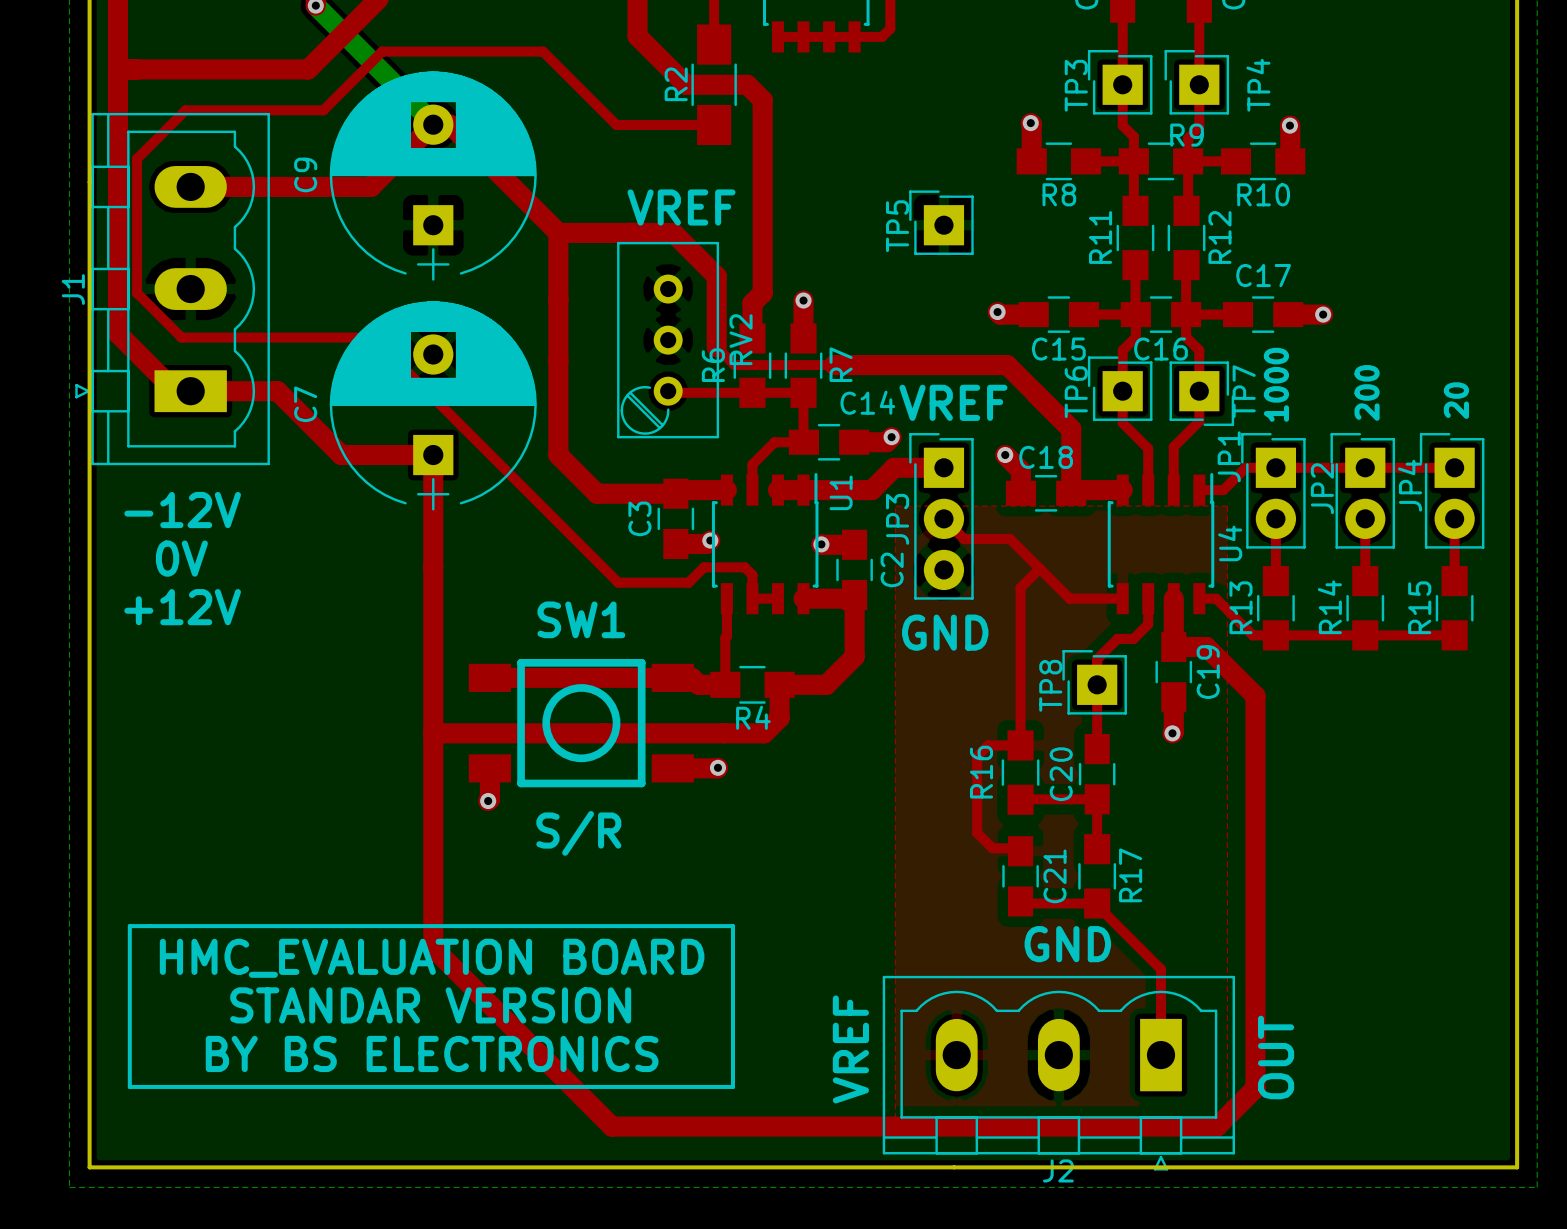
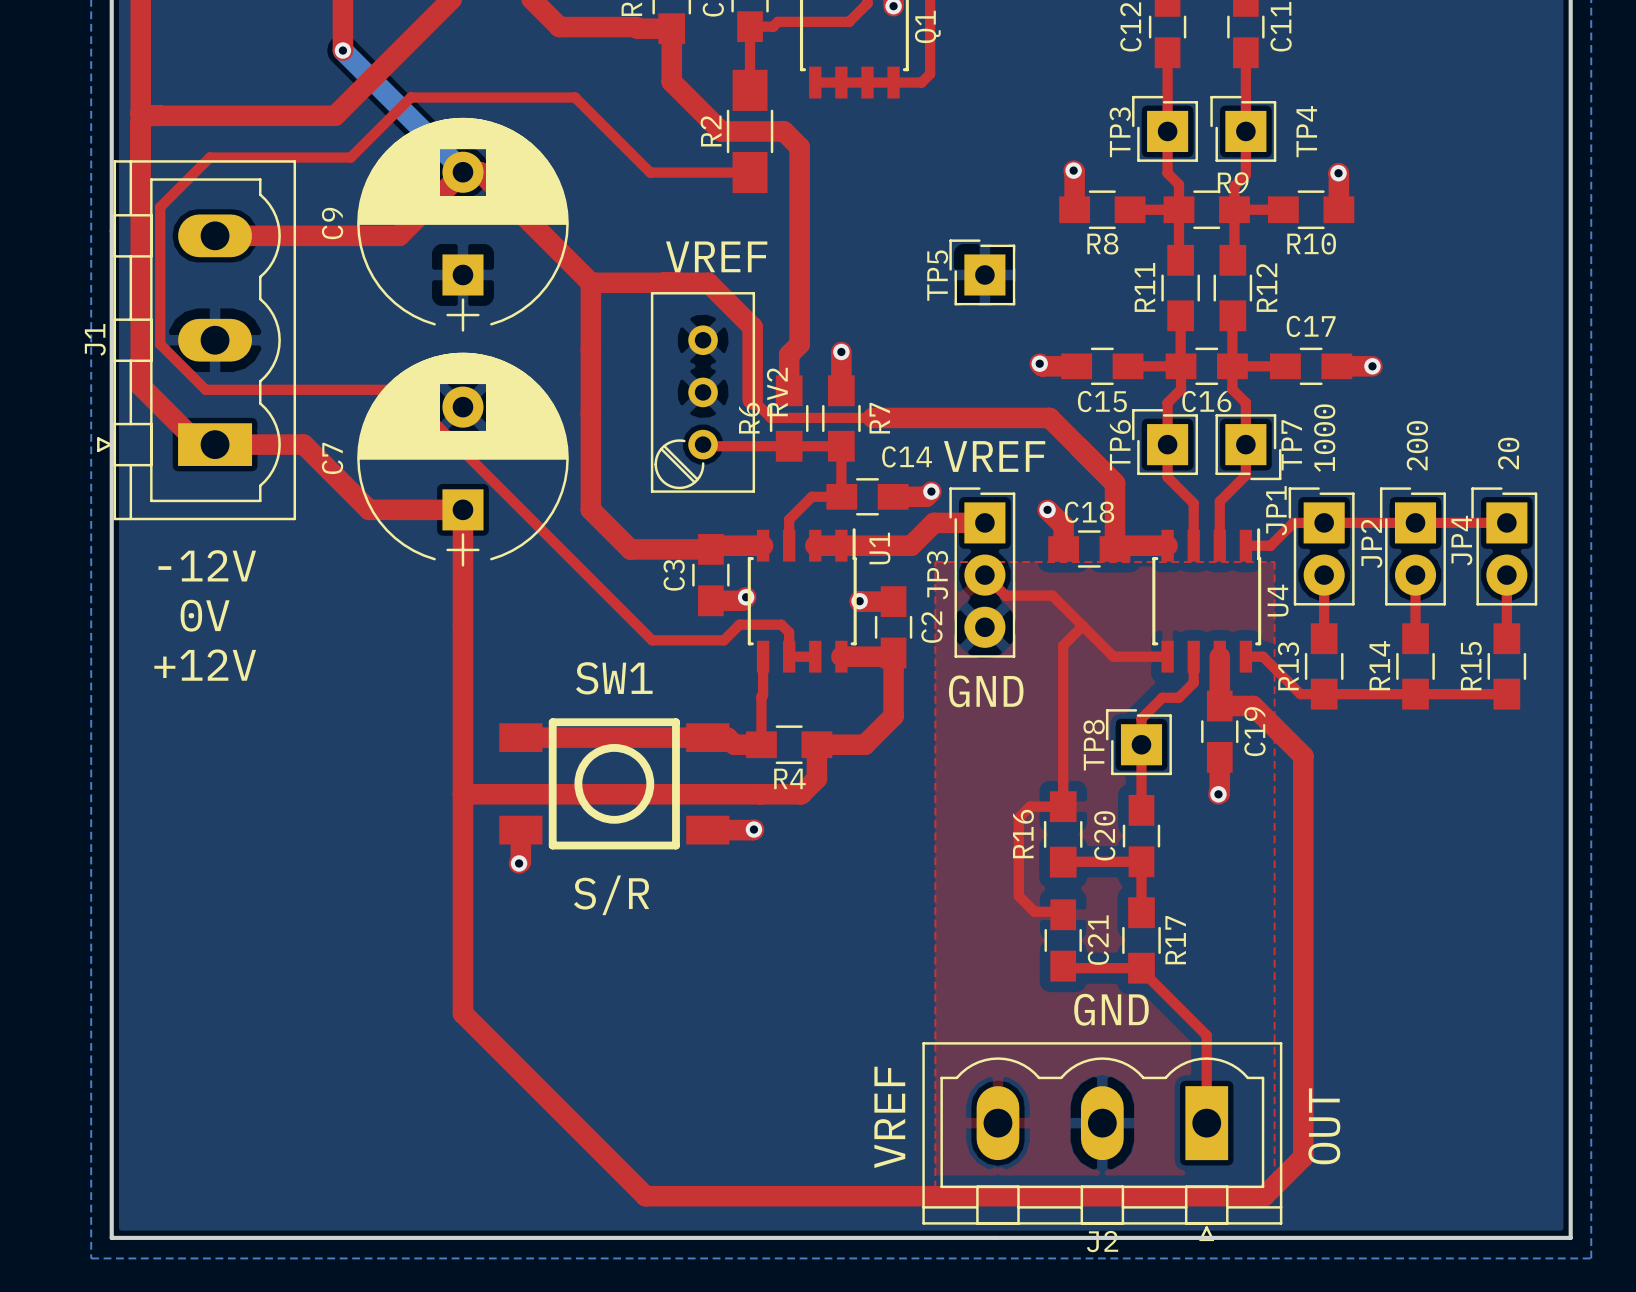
line: (129, 926) (732, 926) (732, 1086) (129, 1086) (129, 926) -> none
text: HMC_EVALUATION BOARD (432, 958) -> none
text: STANDAR VERSION (430, 1005) -> none
text: BY BS ELECTRONICS (432, 1053) -> none

